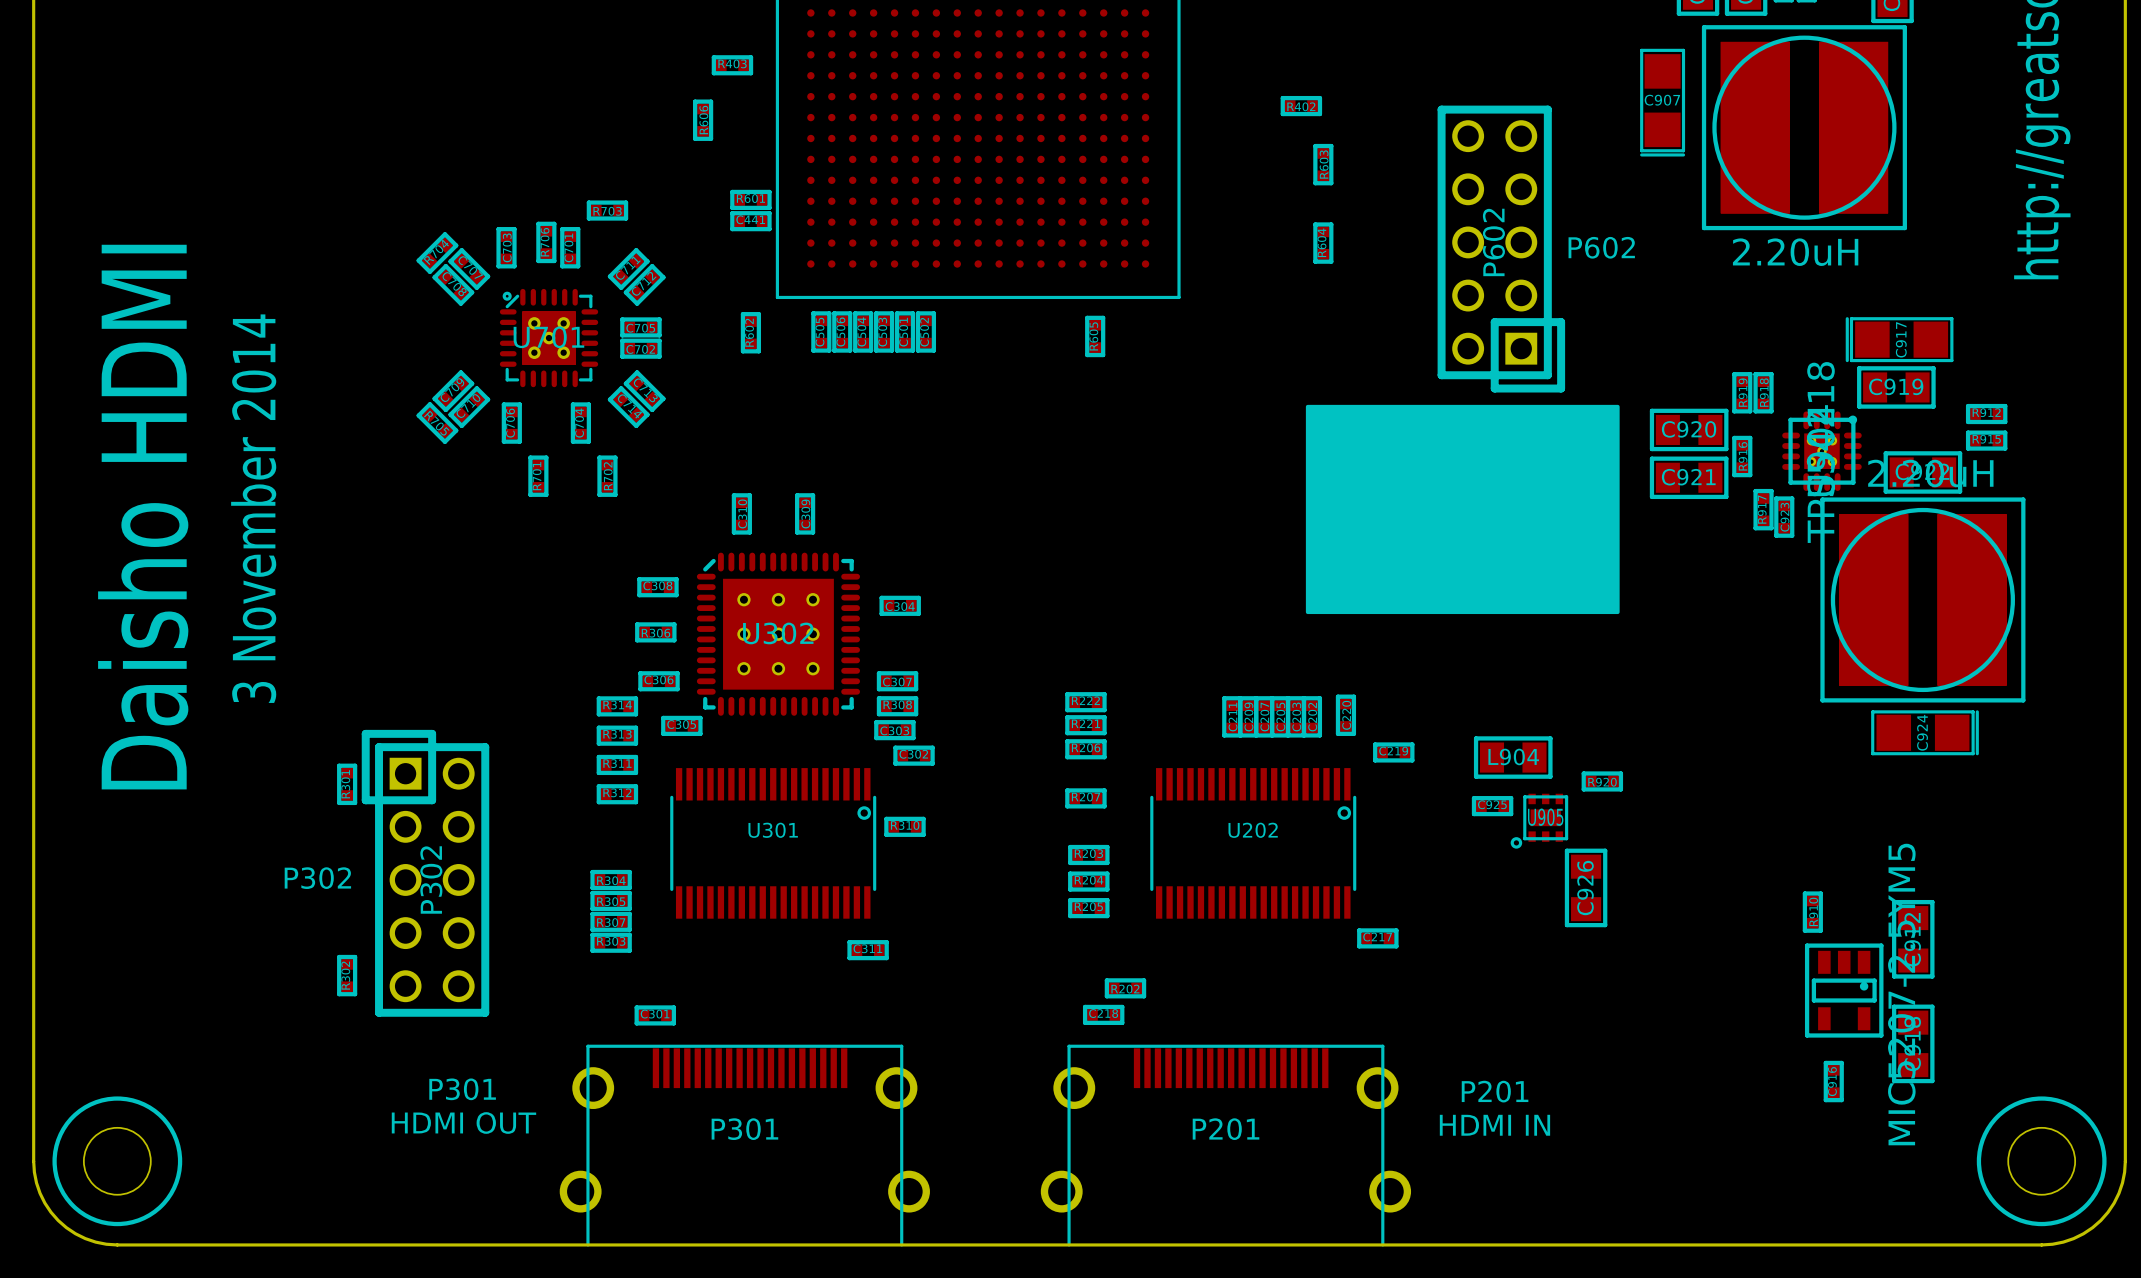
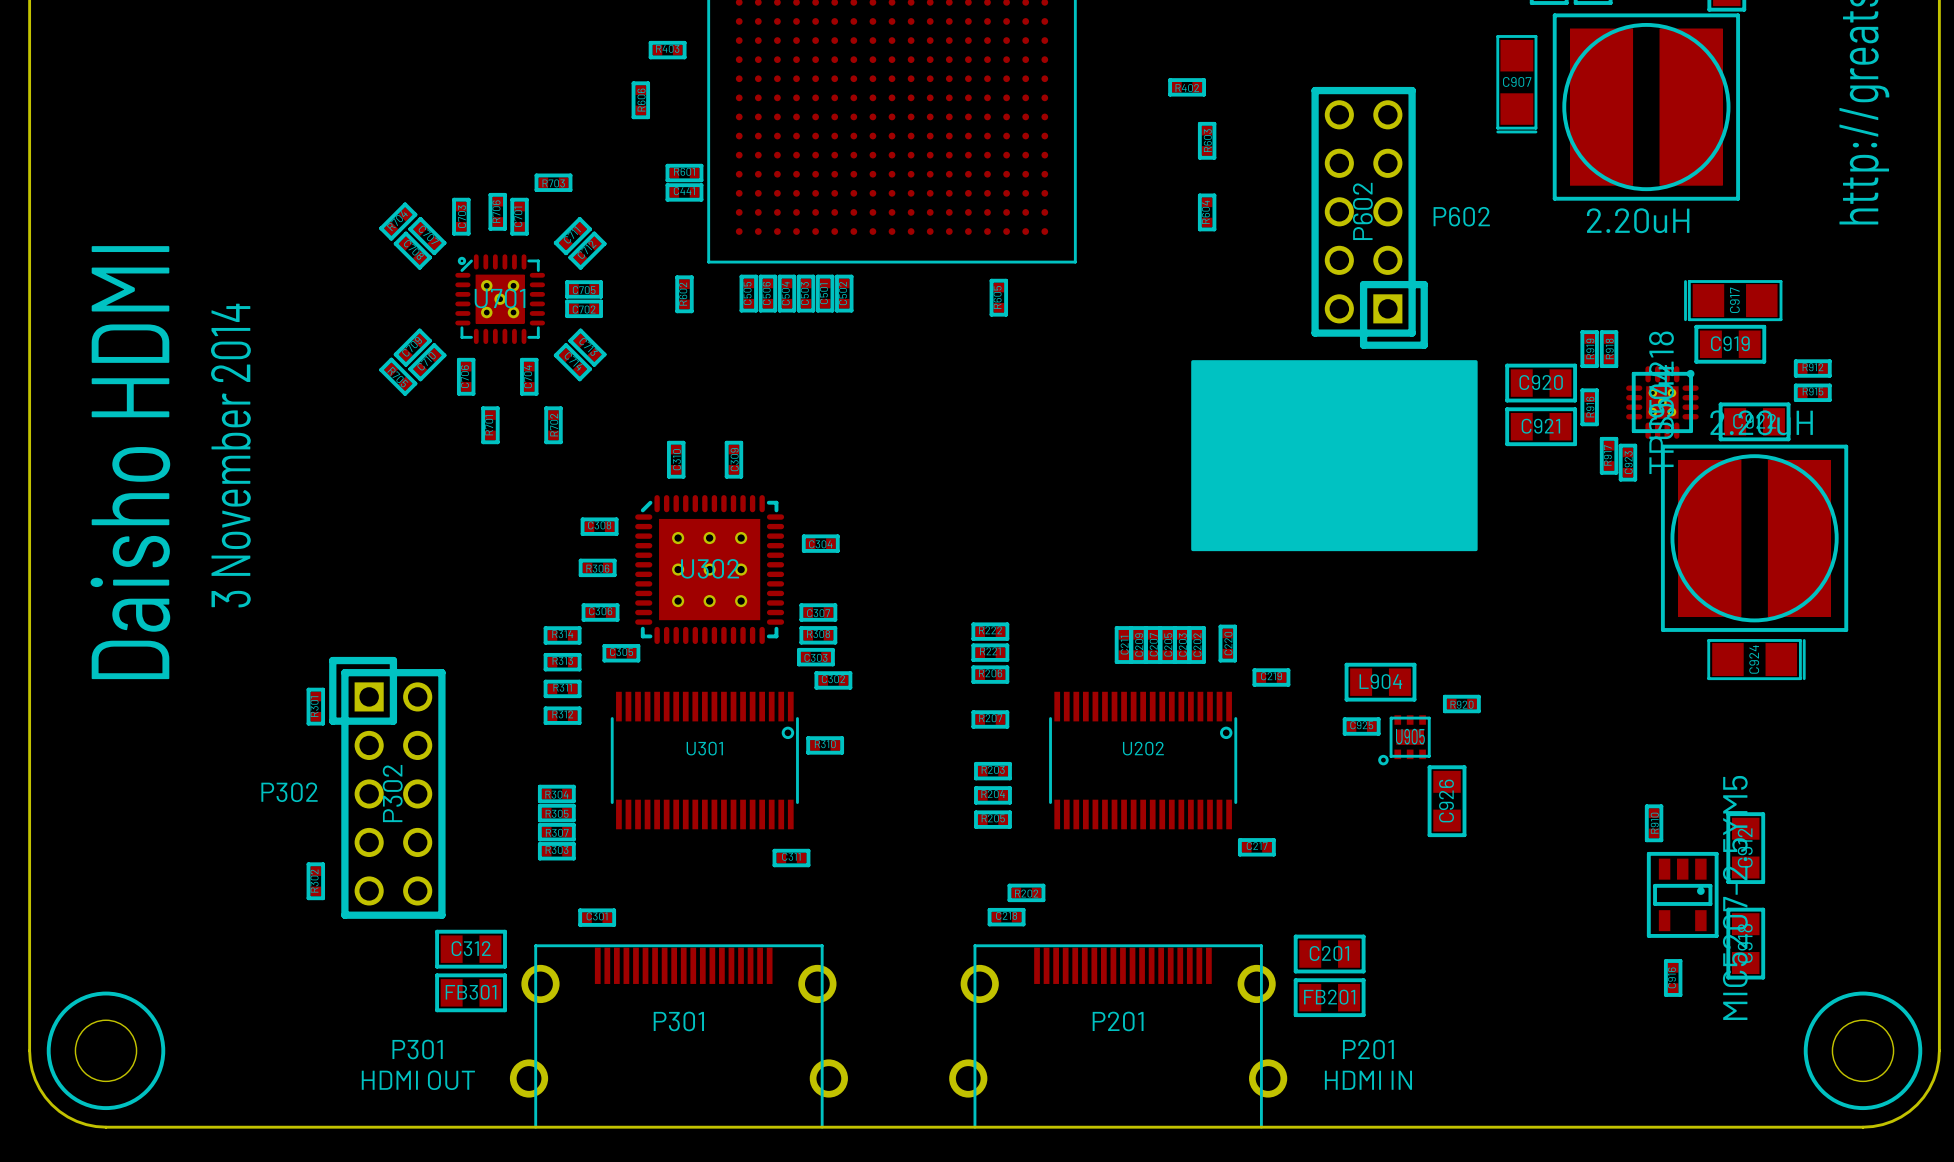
C312: none -> (471, 949)
C201: none -> (1329, 954)
text position: P301 (462, 1089) -> P301 (417, 1049)
text position: P201 (1495, 1091) -> P201 (1368, 1049)
FB301: none -> (471, 992)
FB201: none -> (1329, 997)
text position: HDMI OUT (463, 1123) -> HDMI OUT (418, 1080)
text position: HDMI IN (1494, 1125) -> HDMI IN (1368, 1080)

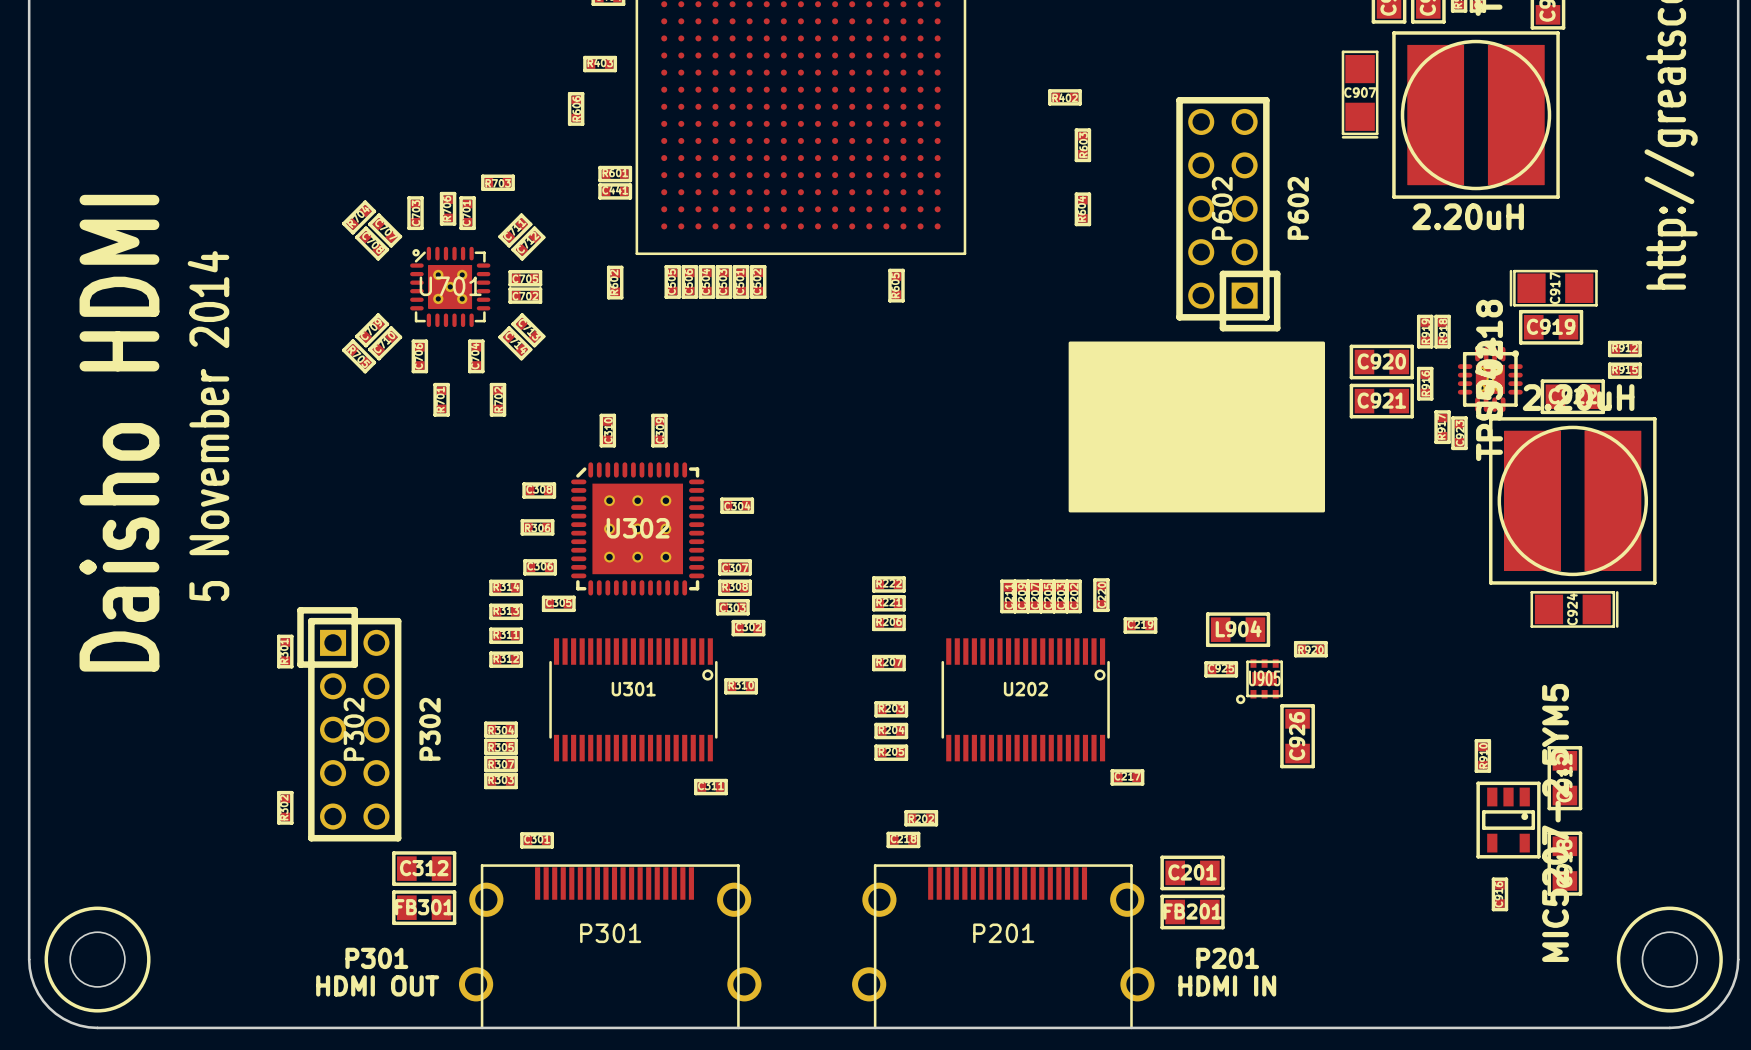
text rotation: 0° (1461, 216) -> 90° counterclockwise (1298, 208)
text: 3 November 2014 (230, 455) -> 5 November 2014 (208, 426)
text rotation: 0° (289, 792) -> 90° counterclockwise (430, 729)
text position: P302 (289, 792) -> P302 (430, 729)

